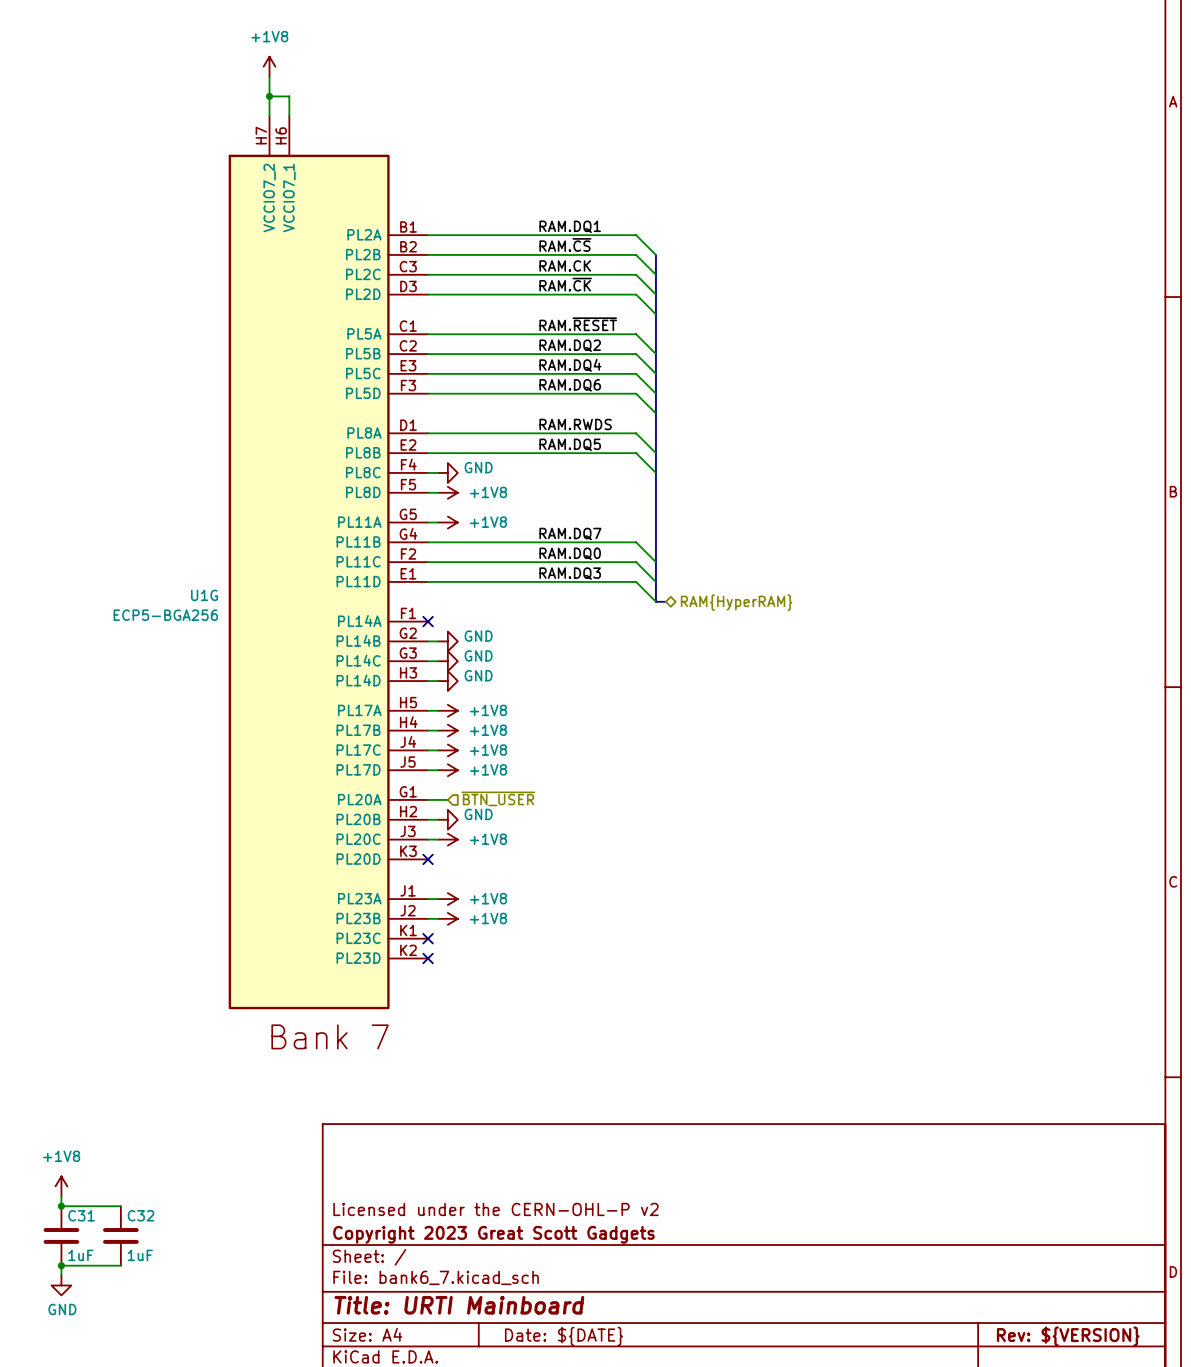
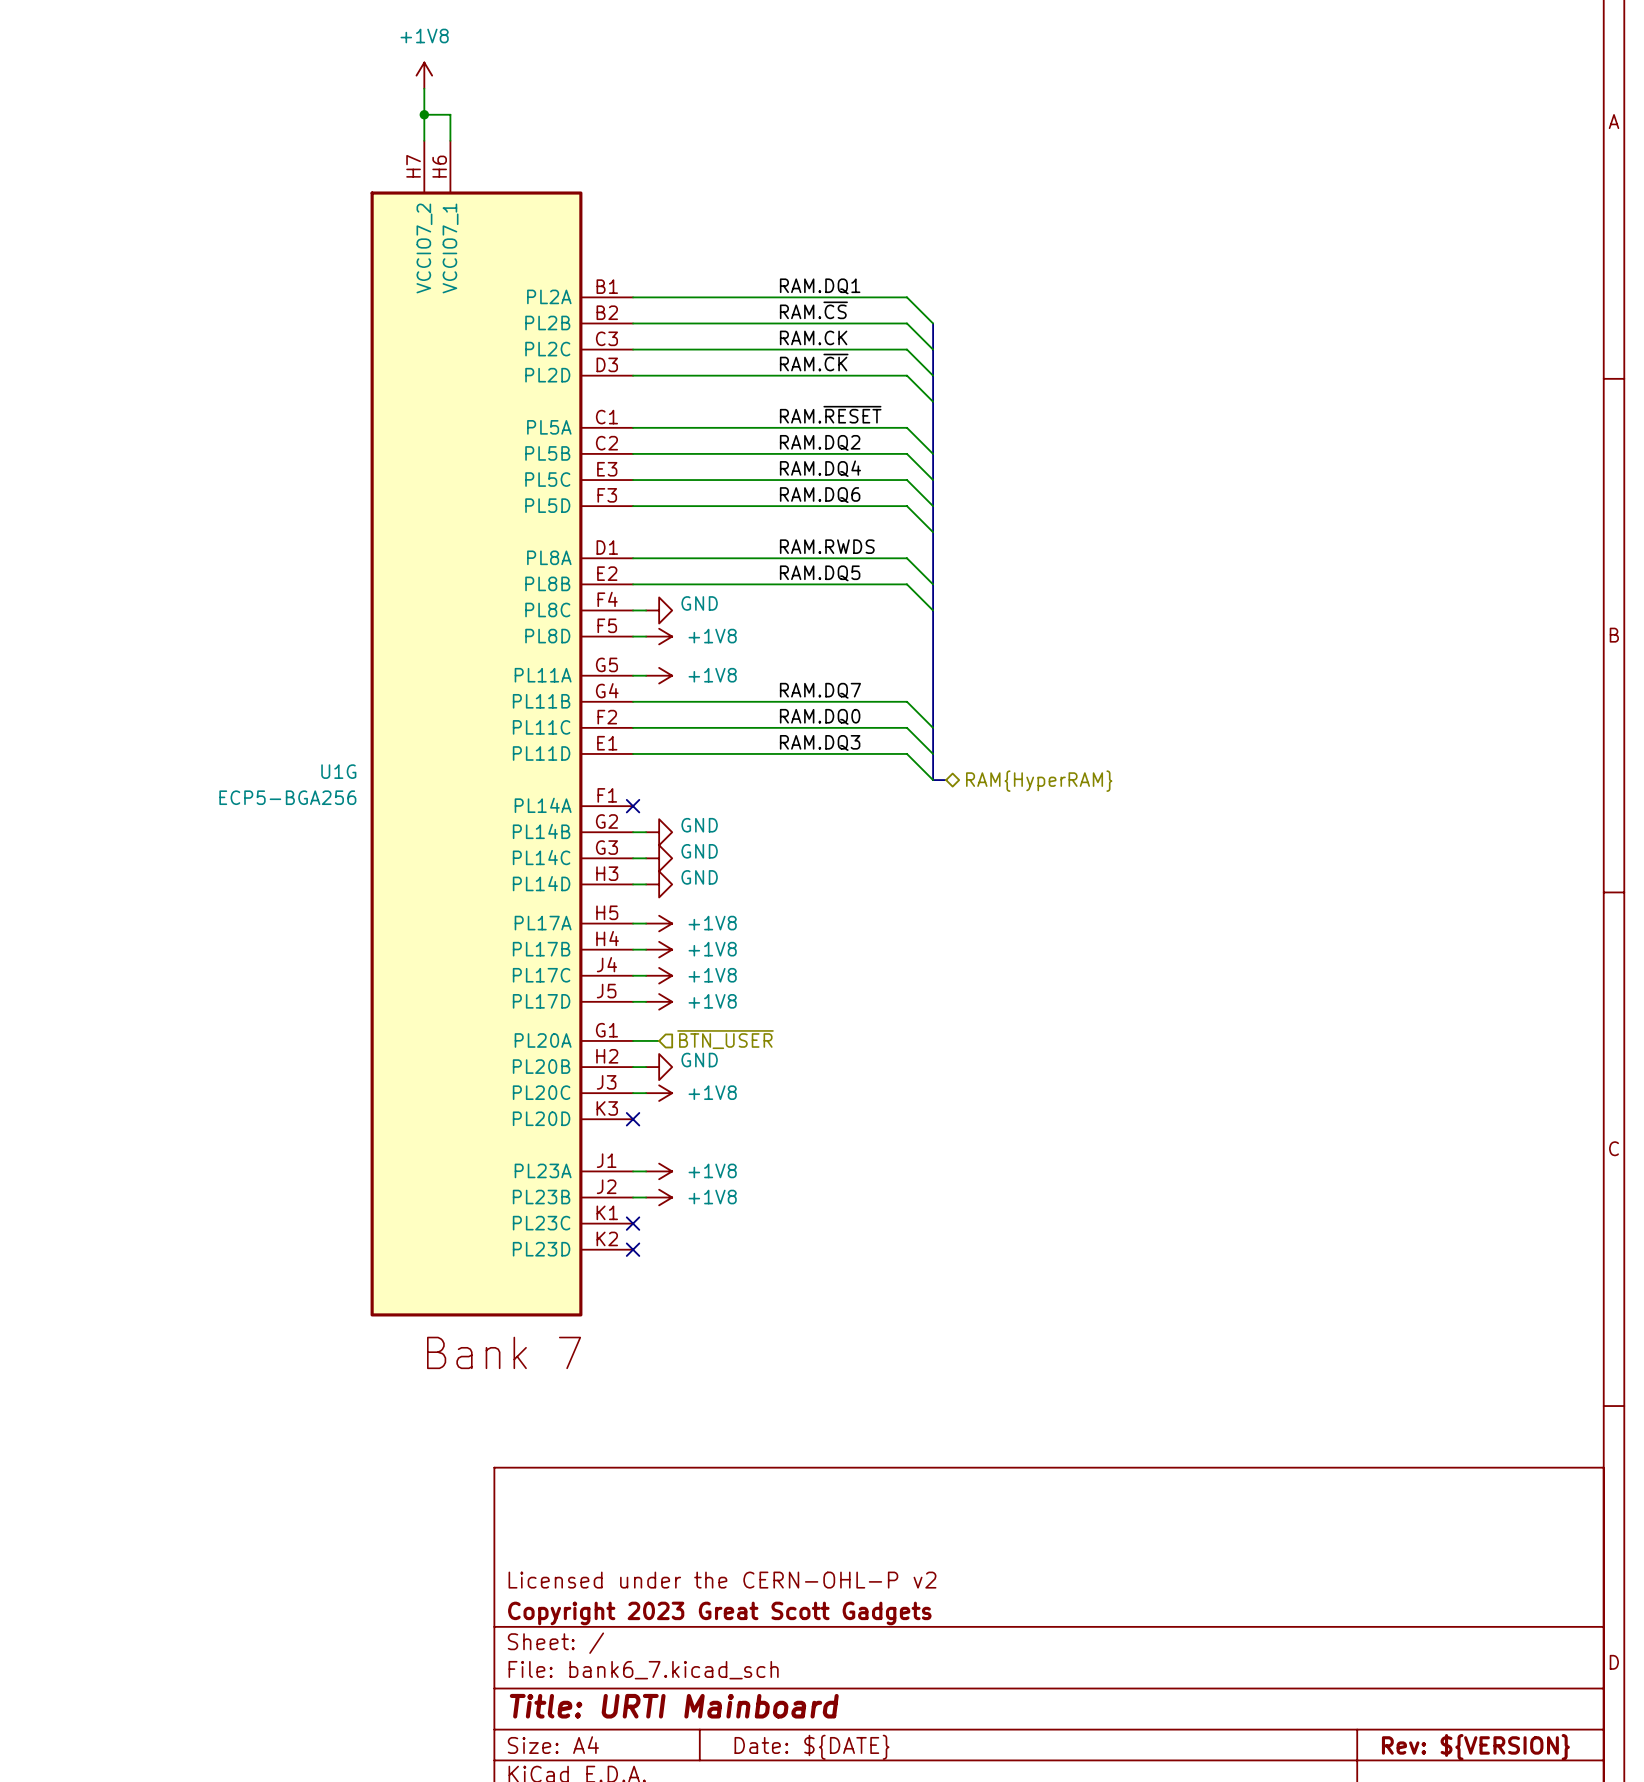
power symbol: +1V8 (61, 1186) -> none
wire: (61, 1196) (61, 1206) (120, 1206) -> none
junction: (61, 1206) -> none
C31: 1uF (61, 1235) -> none
C32: 1uF (120, 1235) -> none
junction: (61, 1265) -> none
wire: (120, 1265) (61, 1265) (61, 1275) -> none
power symbol: GND (61, 1285) -> none

